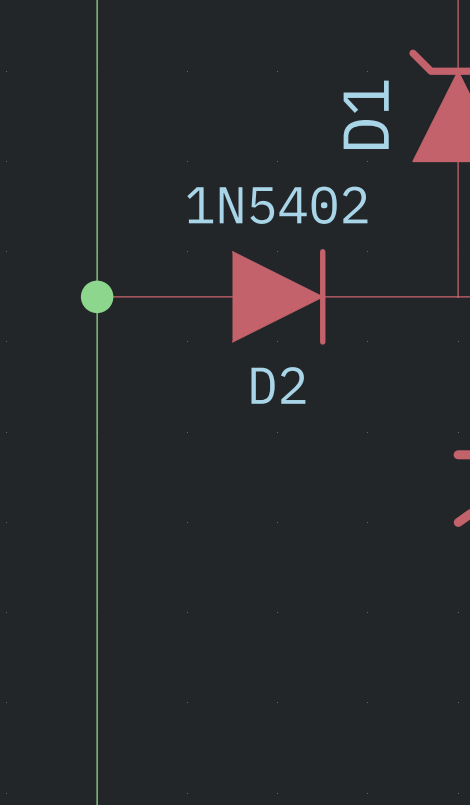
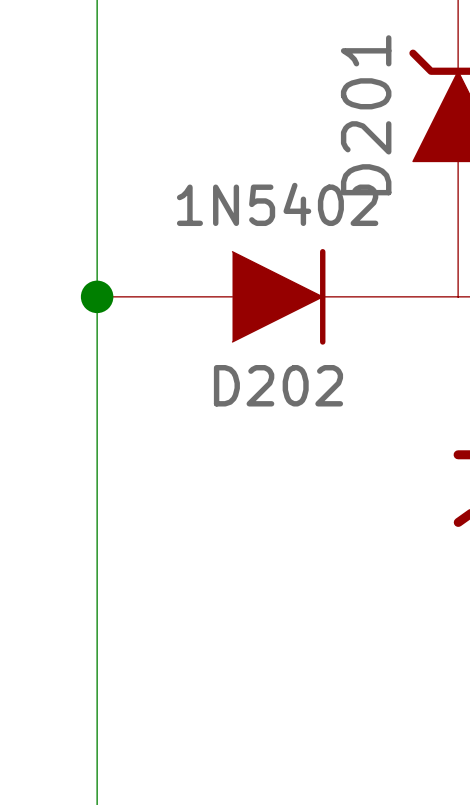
D1 name: D1 (366, 114) -> D201 (366, 115)
D2 name: D2 (278, 385) -> D202 (278, 385)

